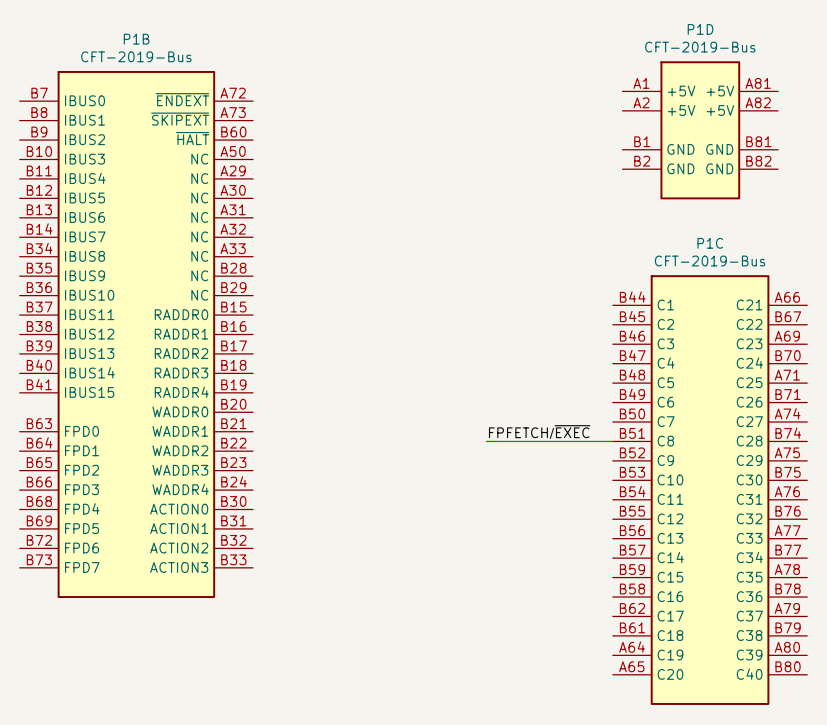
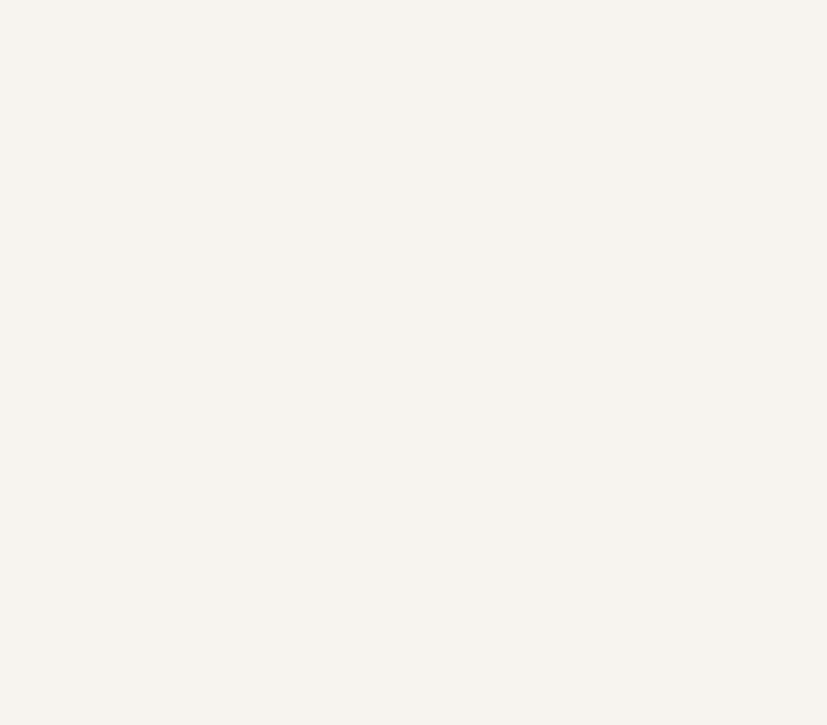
P1D: CFT-2019-Bus (700, 130) -> none
P1B: CFT-2019-Bus (136, 334) -> none
label: FPFETCH∕~{EXEC} (539, 432) -> none
wire: (486, 441) (612, 441) -> none
P1C: CFT-2019-Bus (710, 490) -> none

